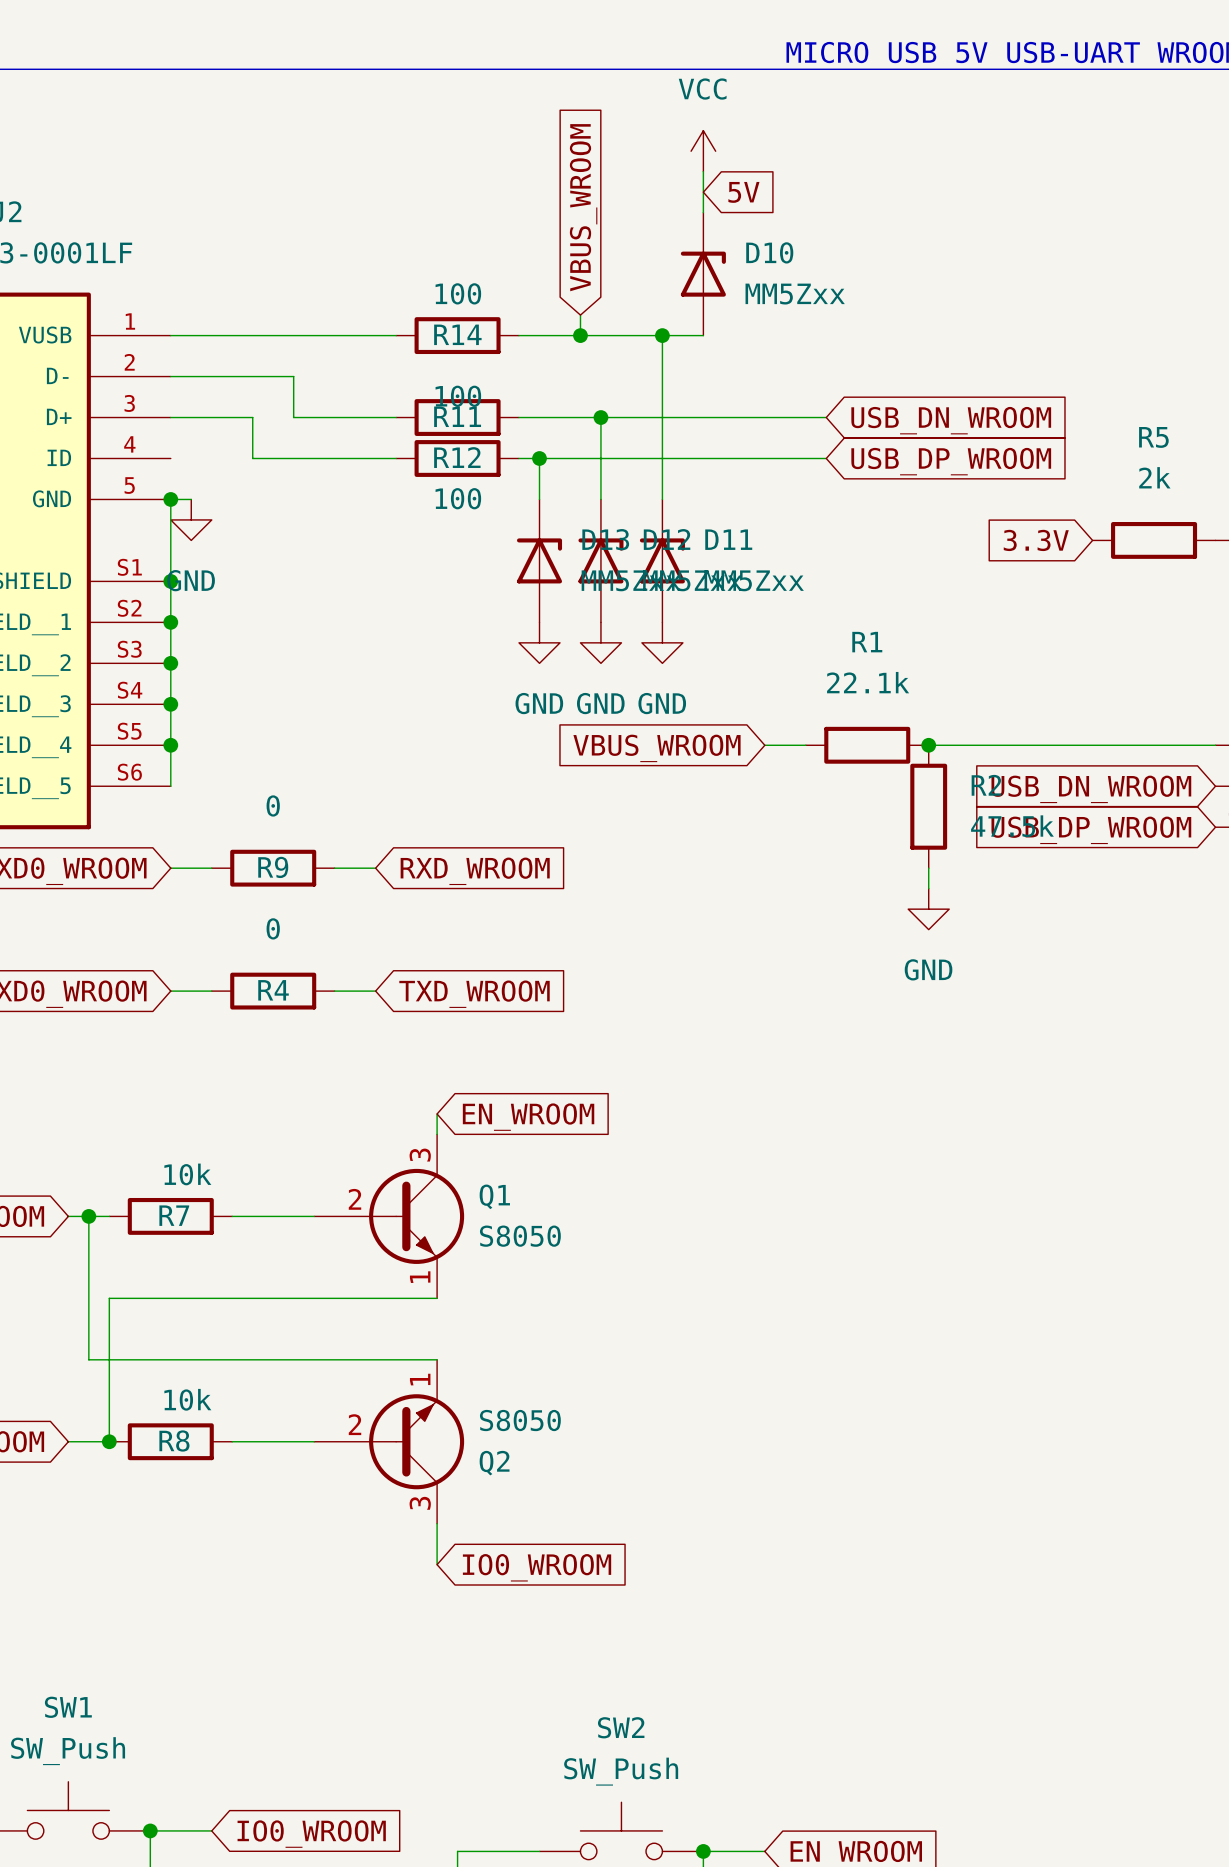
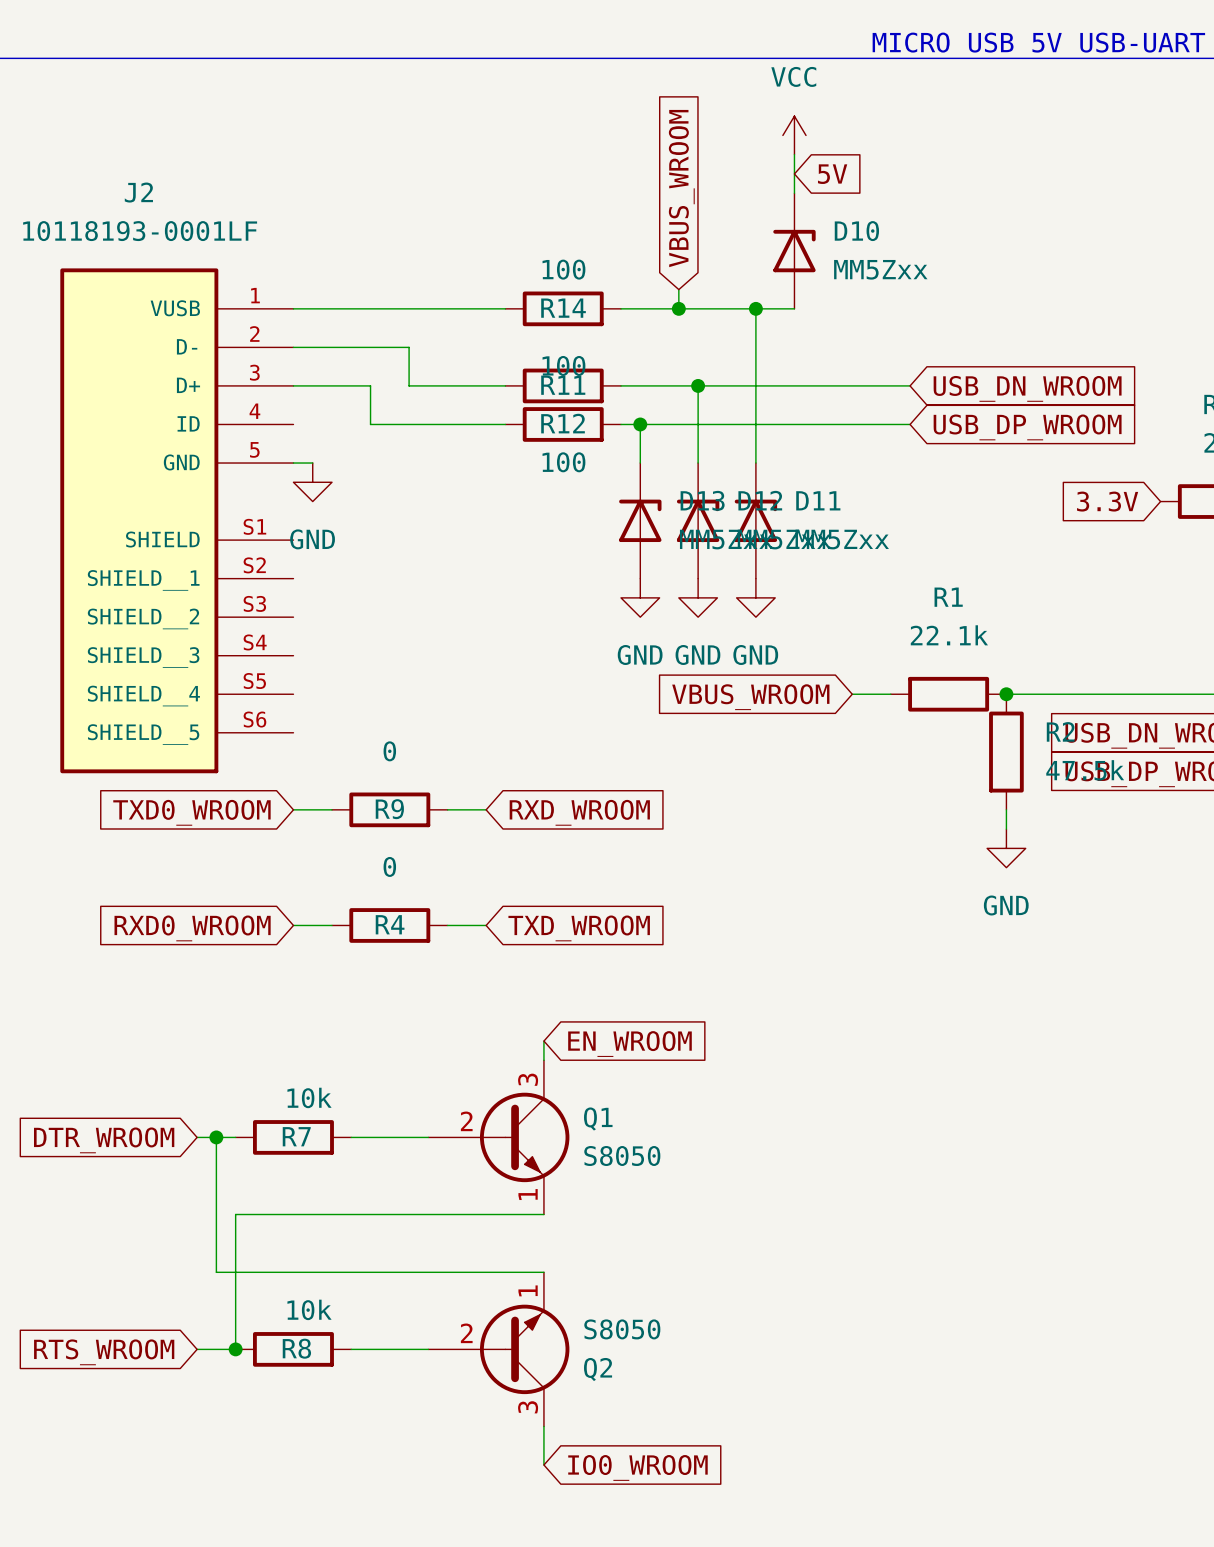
wire: (170, 499) (170, 786) -> none
junction: (170, 499) -> none
junction: (170, 581) -> none
junction: (170, 622) -> none
junction: (170, 663) -> none
junction: (170, 704) -> none
junction: (170, 745) -> none

